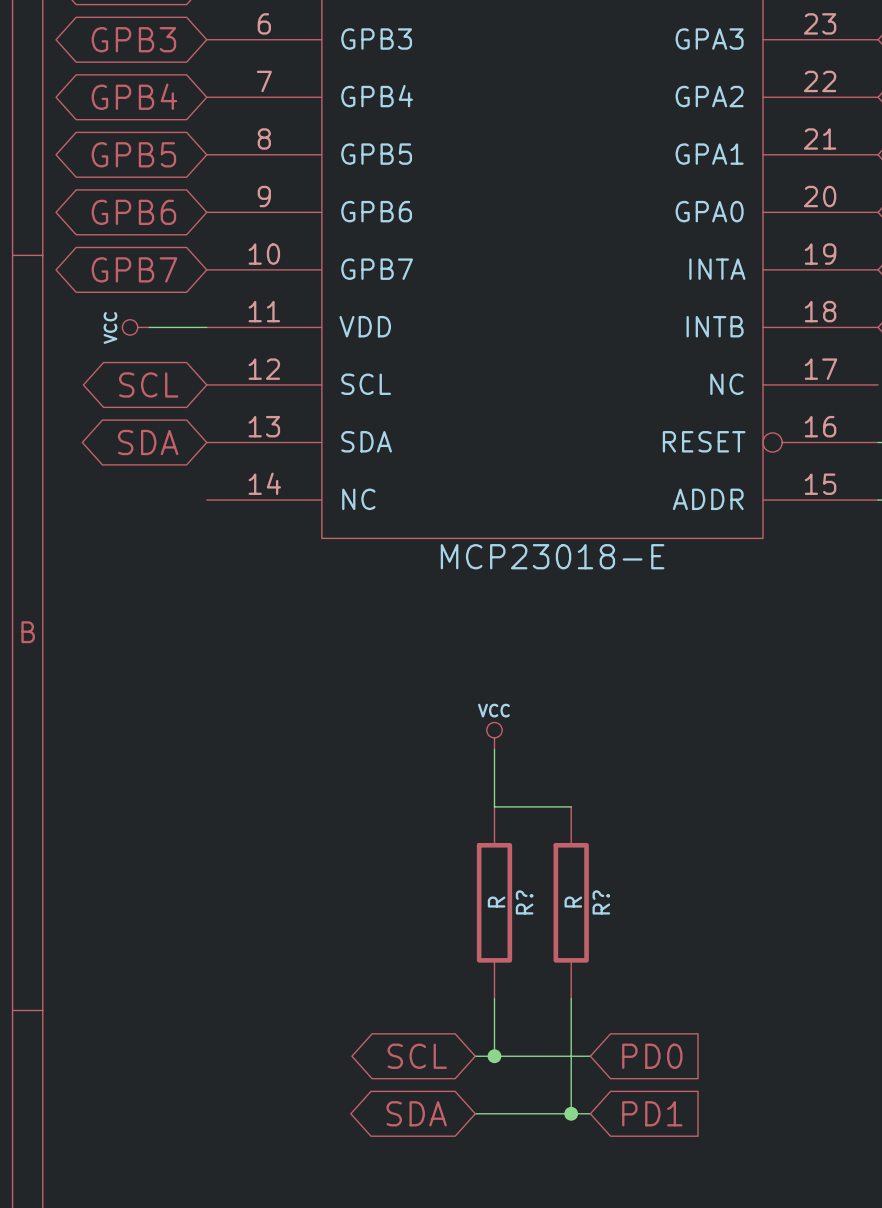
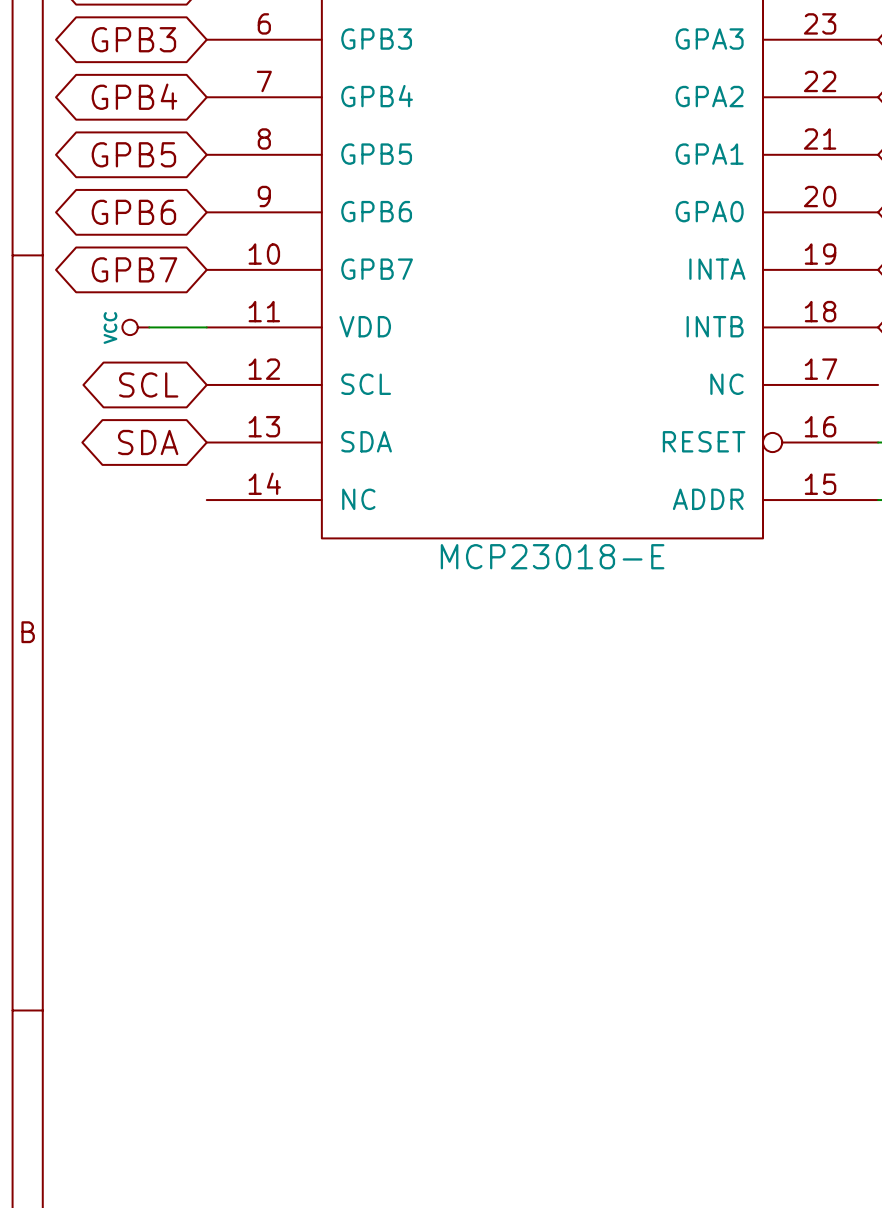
power symbol: VCC (494, 735) -> none
wire: (494, 749) (494, 806) (571, 806) -> none
R?: R (494, 902) -> none
R?: R (571, 902) -> none
wire: (494, 998) (494, 1056) -> none
wire: (571, 998) (571, 1113) -> none
global label: SCL (417, 1056) -> none
wire: (475, 1056) (590, 1056) -> none
junction: (494, 1056) -> none
global label: PD0 (652, 1056) -> none
global label: SDA (416, 1113) -> none
wire: (475, 1113) (590, 1113) -> none
junction: (571, 1113) -> none
global label: PD1 (652, 1113) -> none

